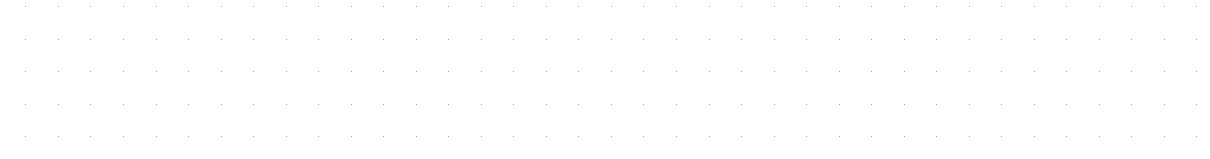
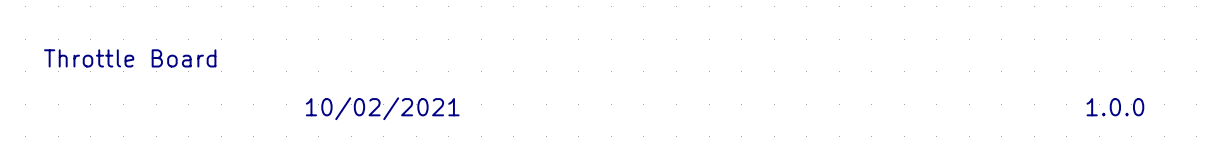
text: none -> Throttle Board (130, 58)
text: none -> 1.0.0 (1115, 107)
text: none -> 10/02/2021 (382, 108)

